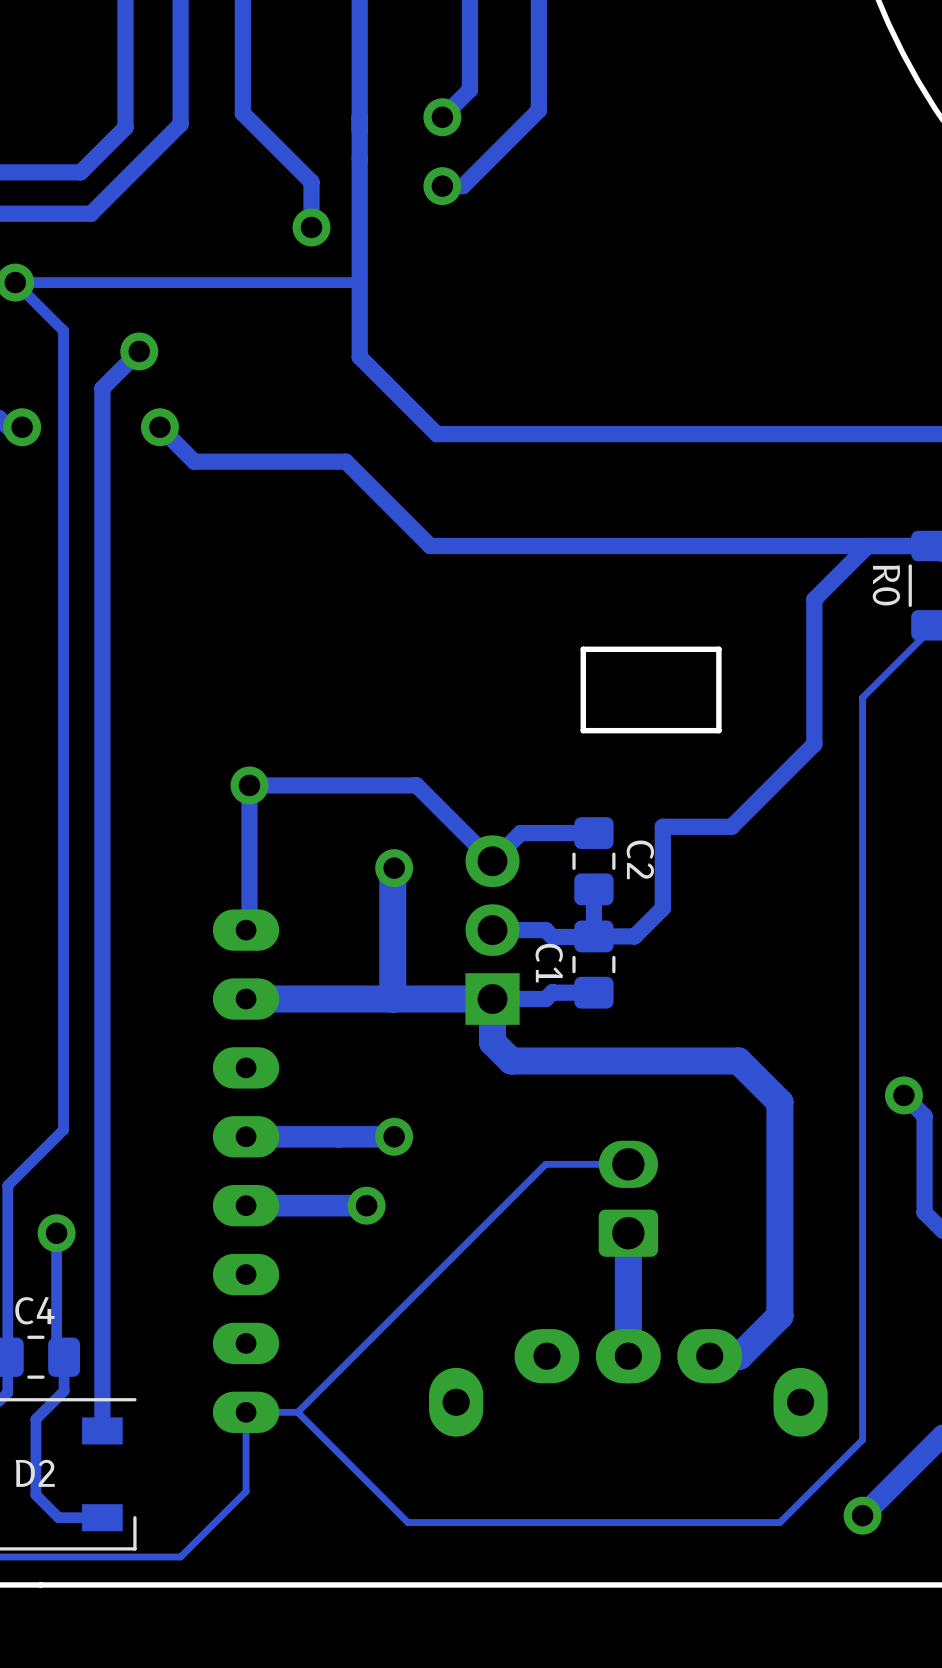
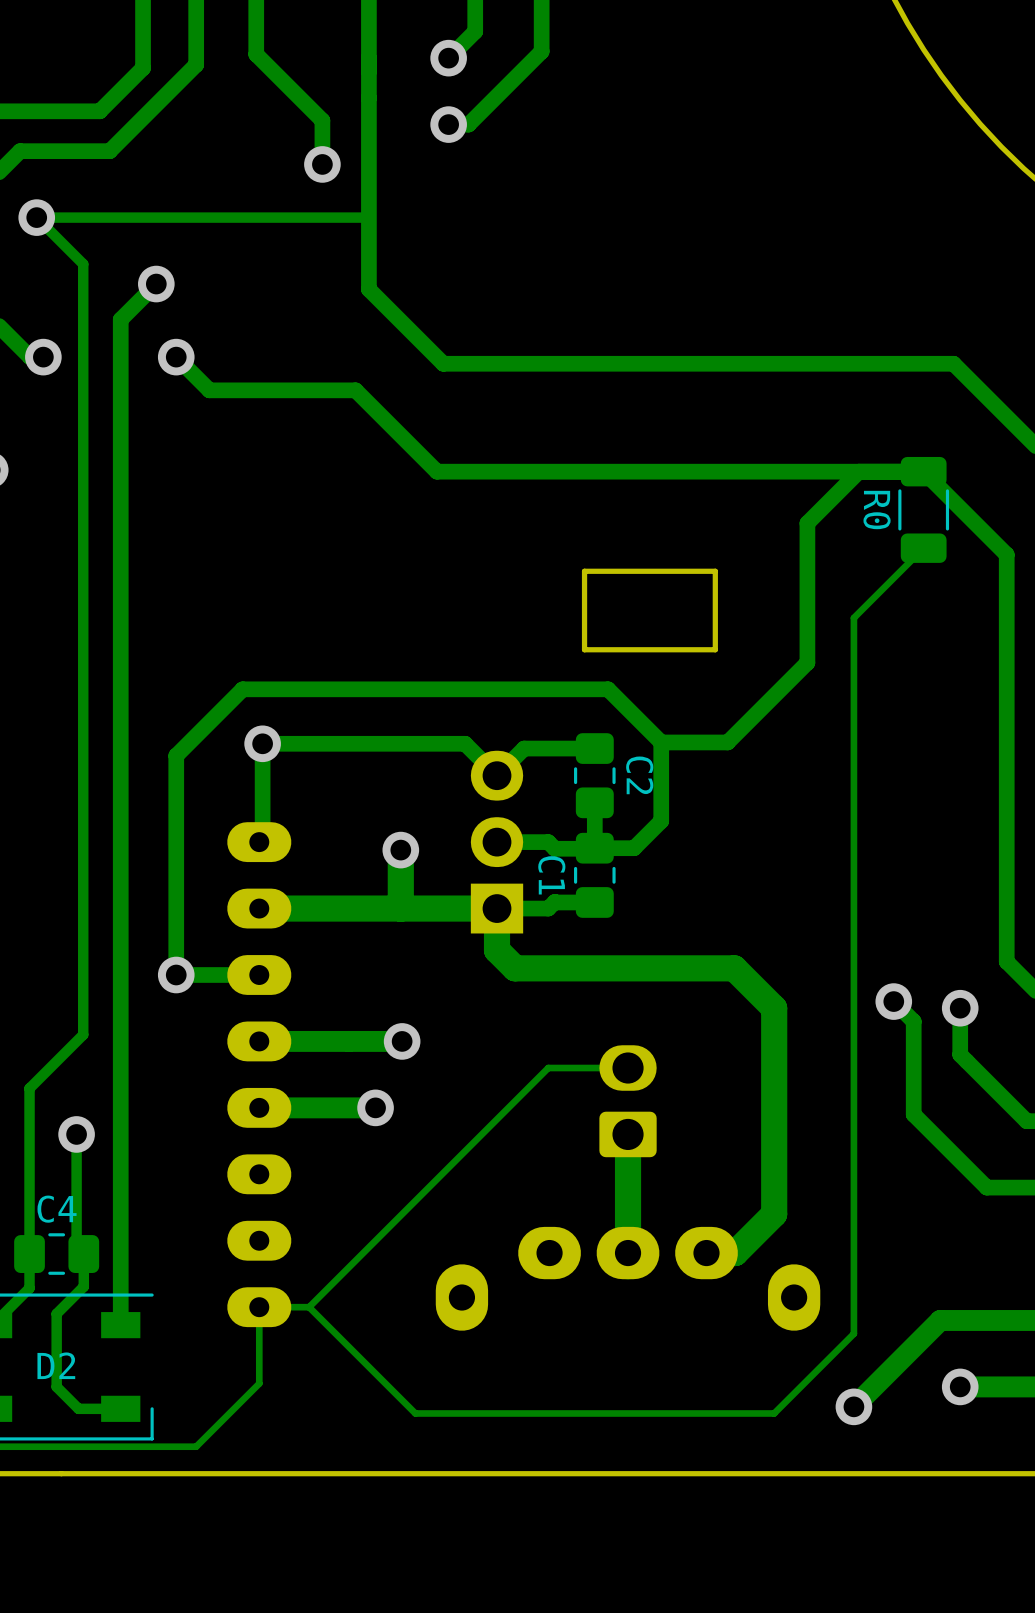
via position: (249, 785) -> (262, 743)
track: none -> (661, 742) (608, 689) (242, 689) (176, 755) (176, 974) (259, 974)
track: (459, 828) (416, 785) (249, 785) (249, 828) -> (465, 743) (262, 743)
track: (394, 868) (392, 938) -> none
via position: (394, 868) -> (400, 850)
via: none -> (176, 974)

